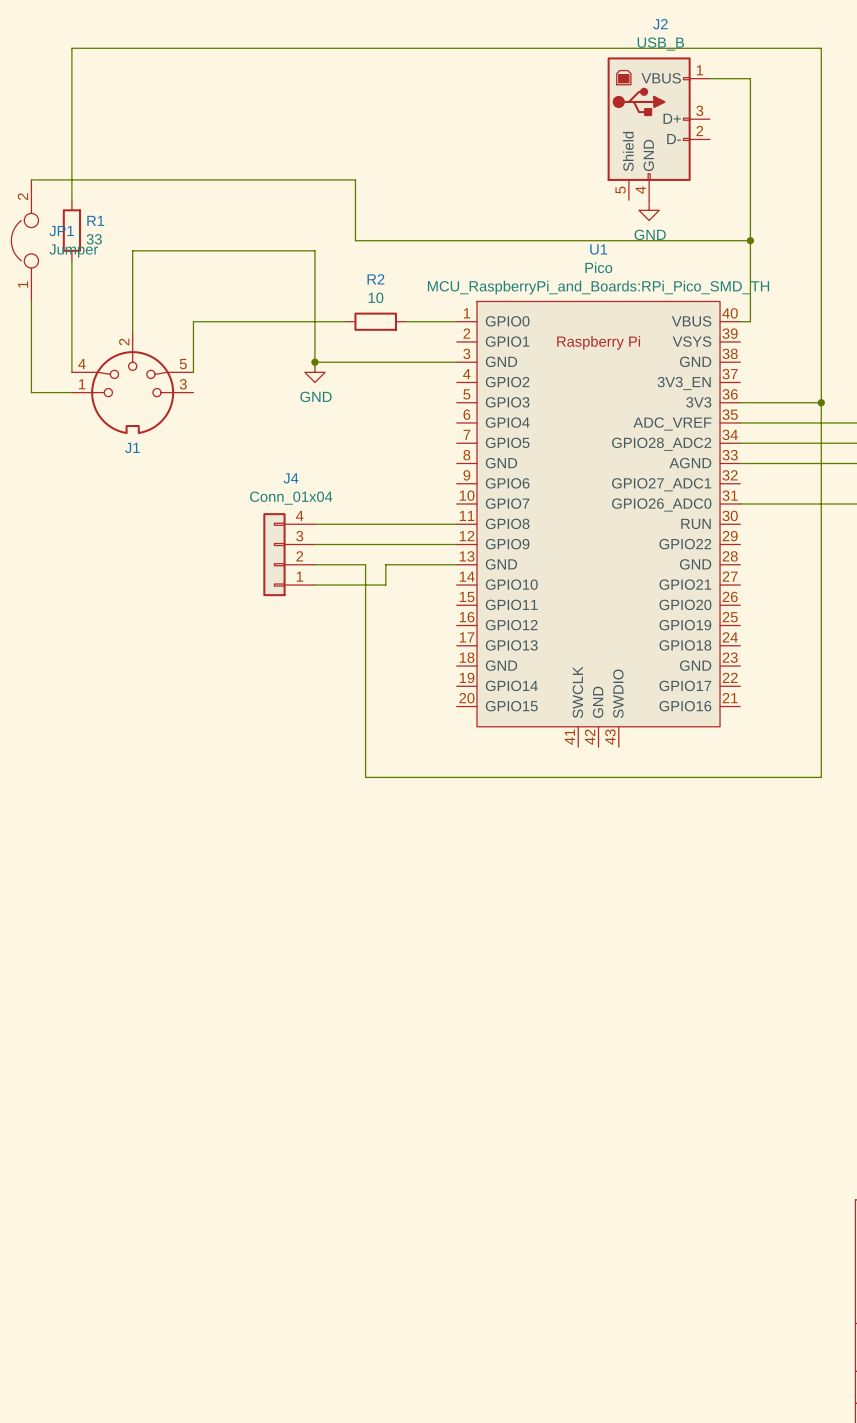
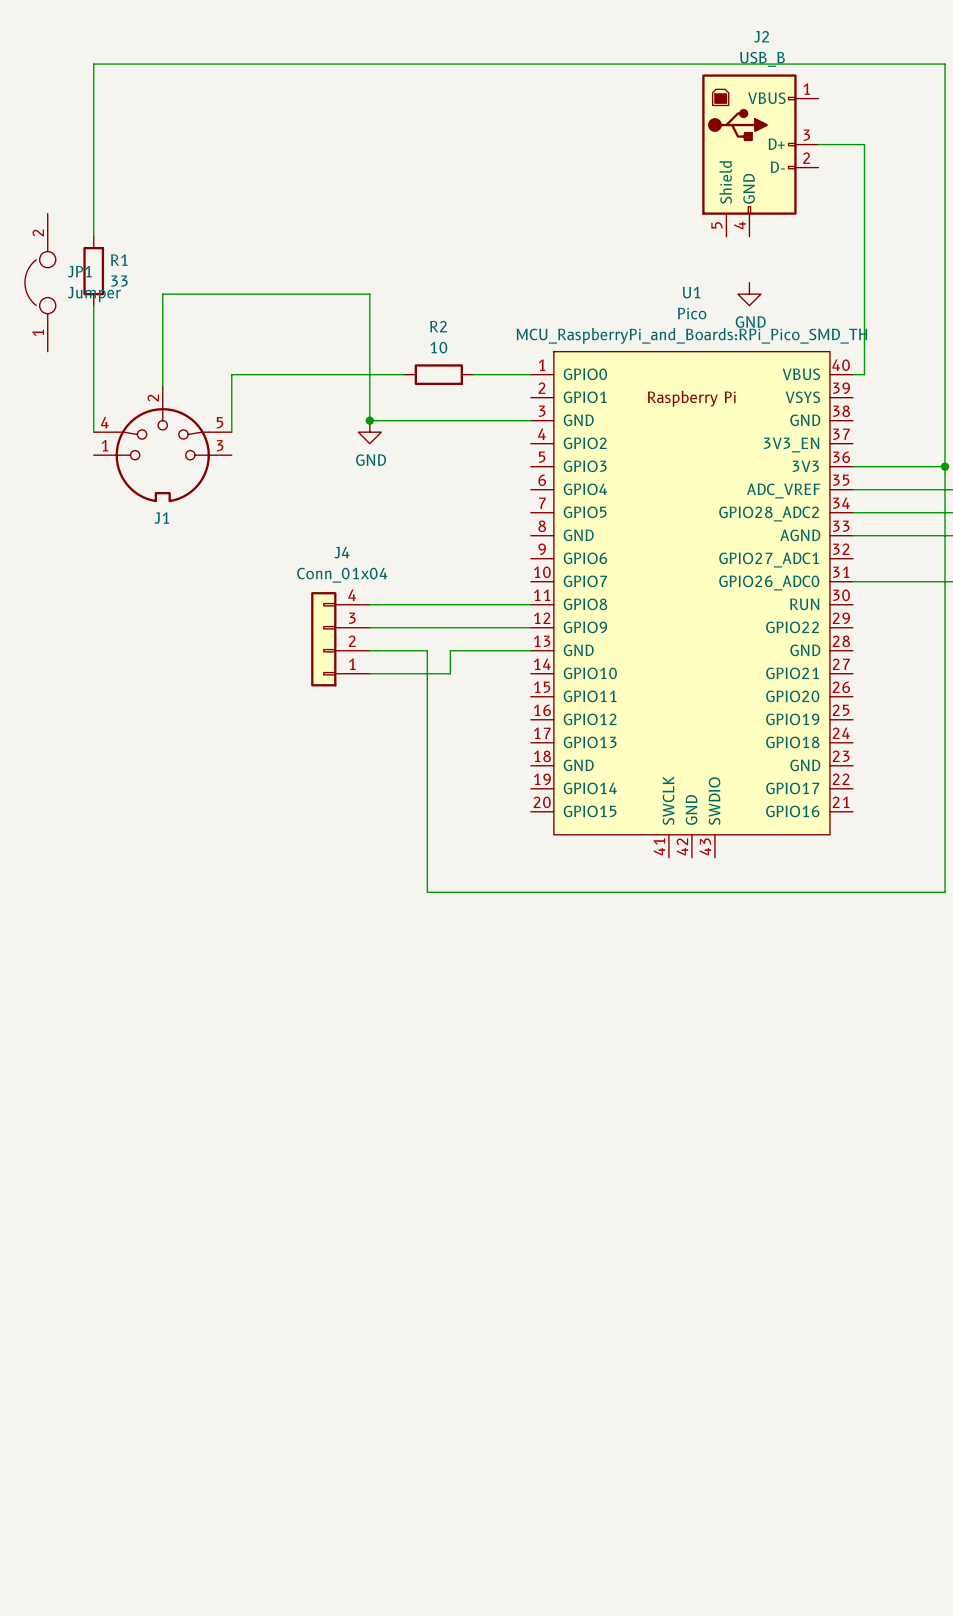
wire: (709, 78) (750, 78) (750, 119) -> (818, 144) (864, 144)
wire: (31, 179) (355, 179) (355, 240) (750, 240) -> none
power symbol position: GND (649, 210) -> GND (749, 294)
junction: (750, 240) -> none
wire: (31, 301) (31, 392) (71, 392) -> none

